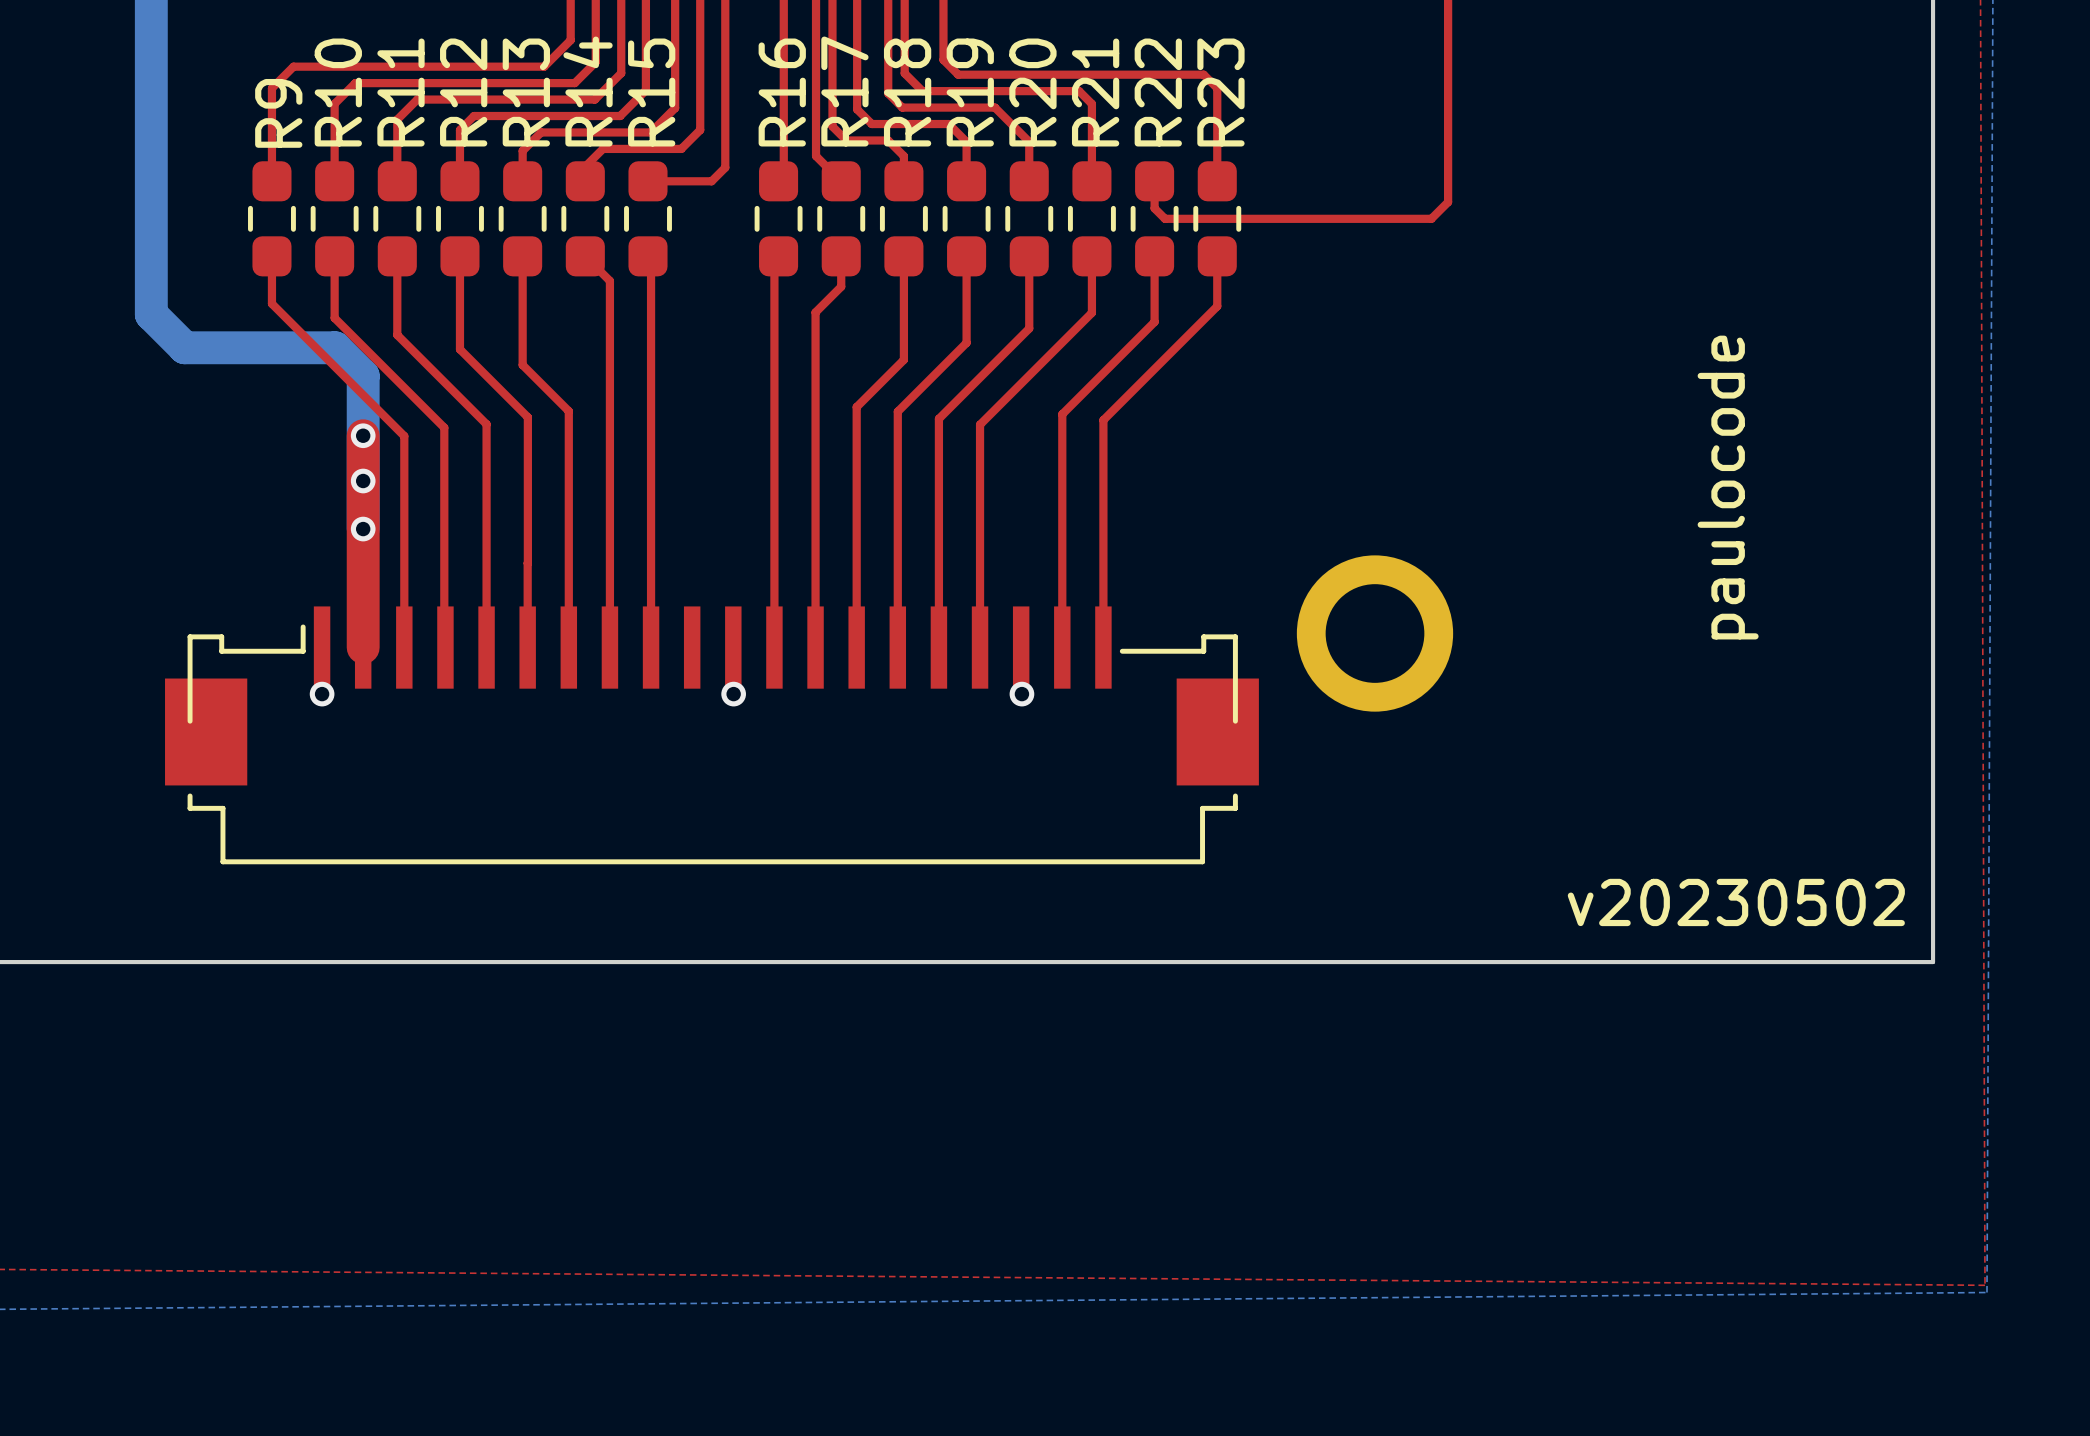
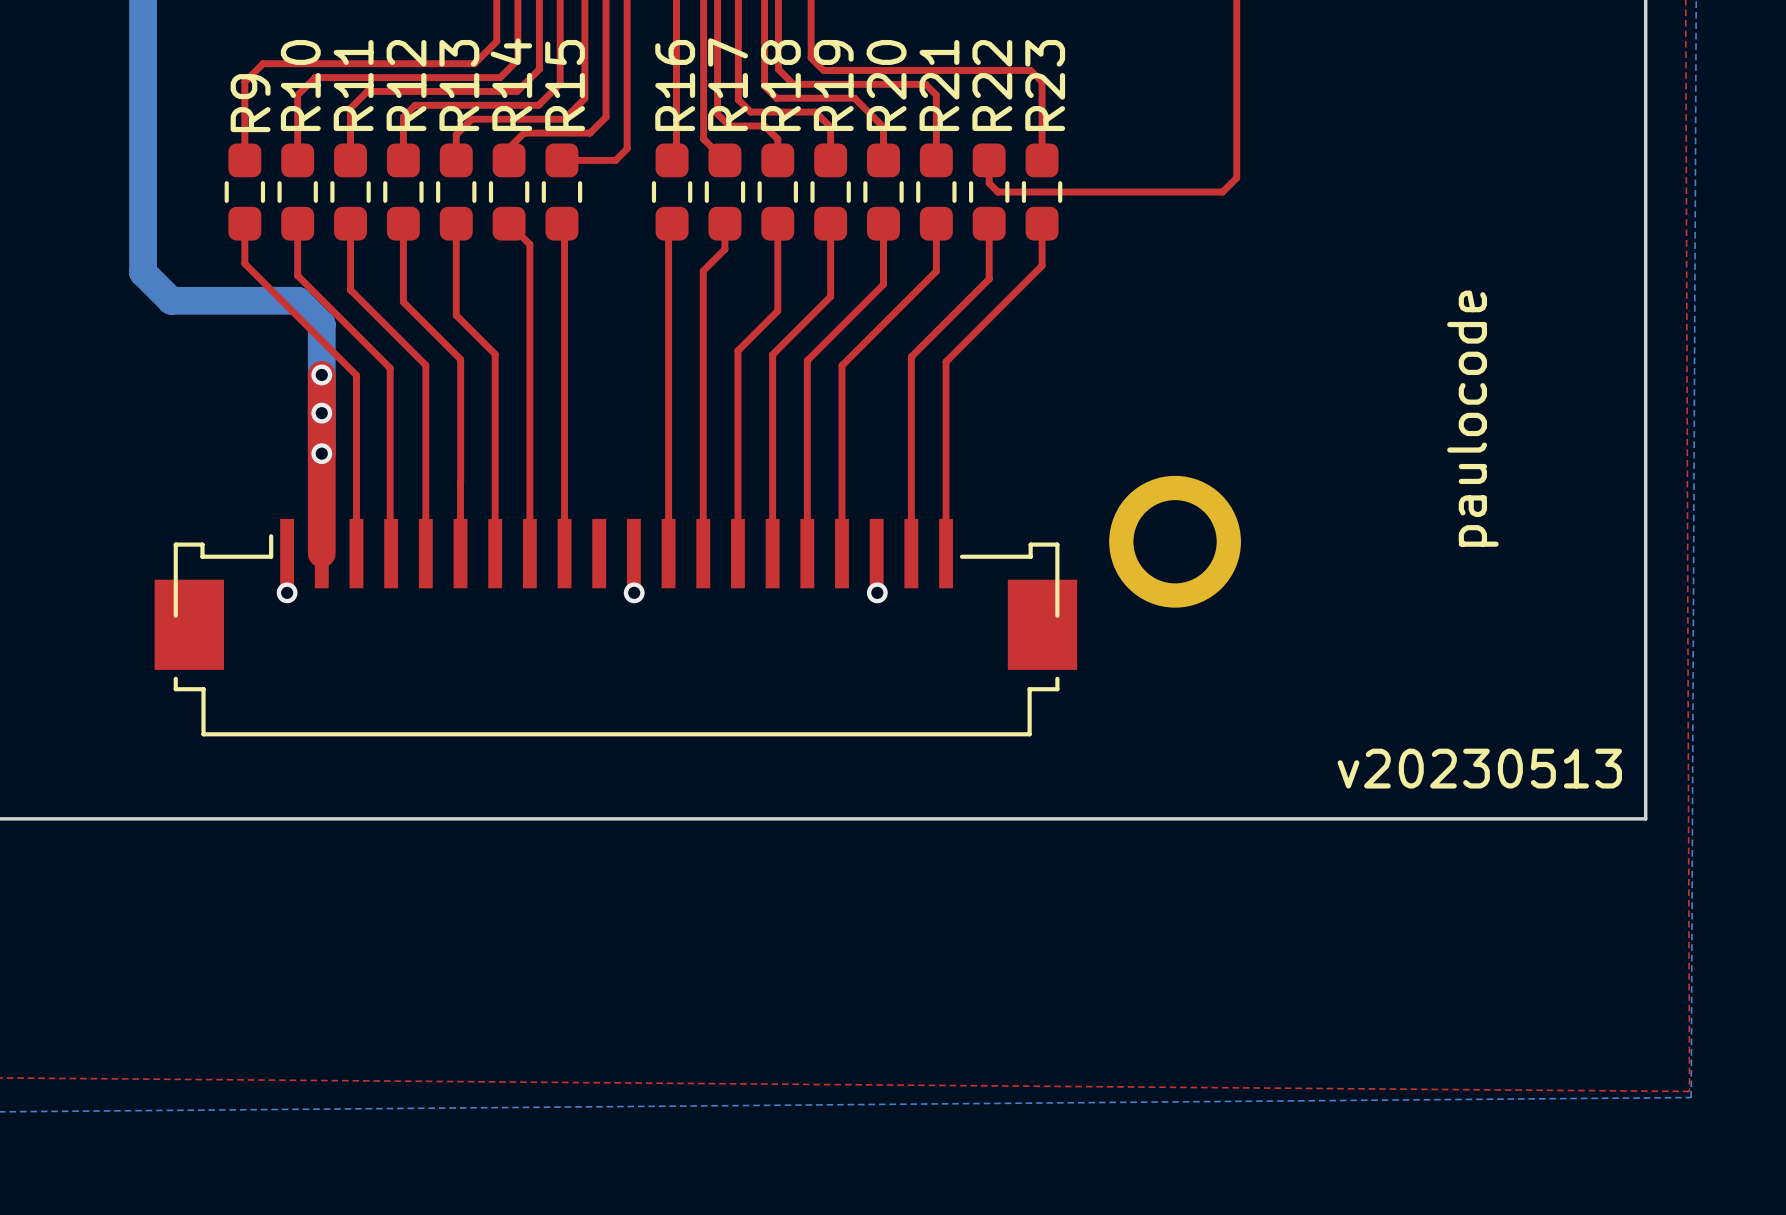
text: v20230502 (1736, 902) -> v20230513 (1479, 768)

